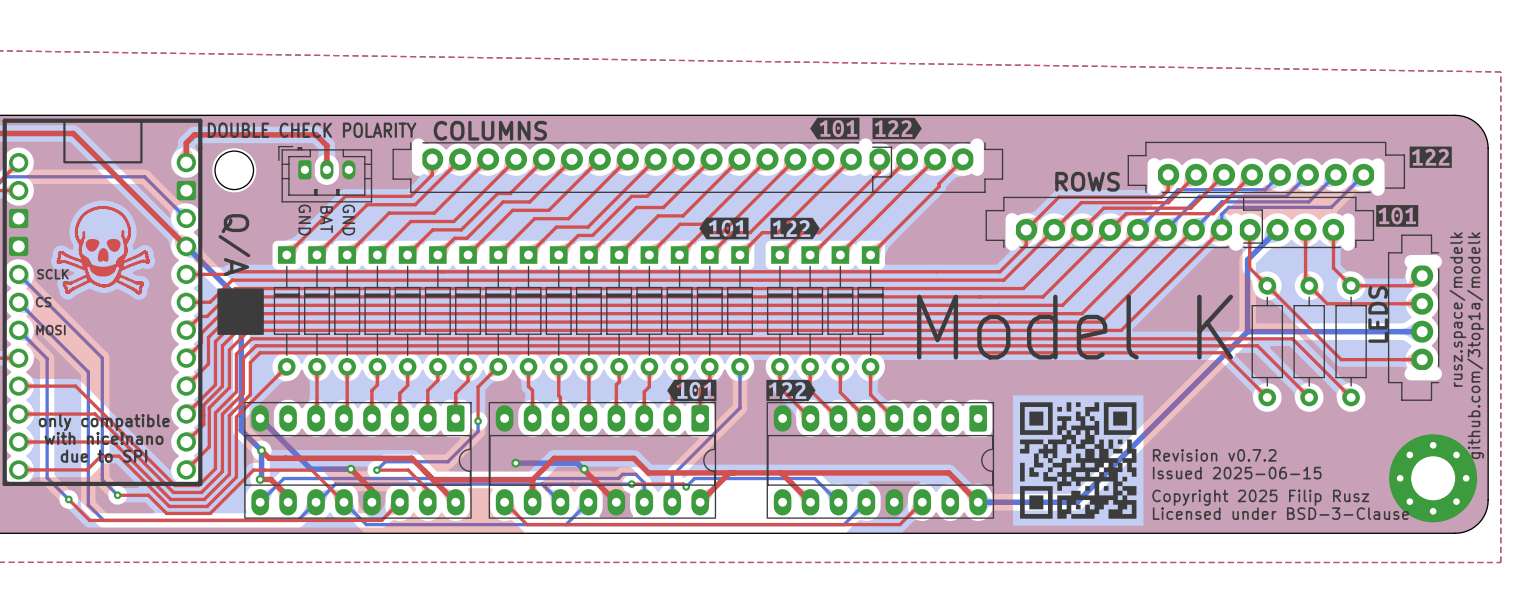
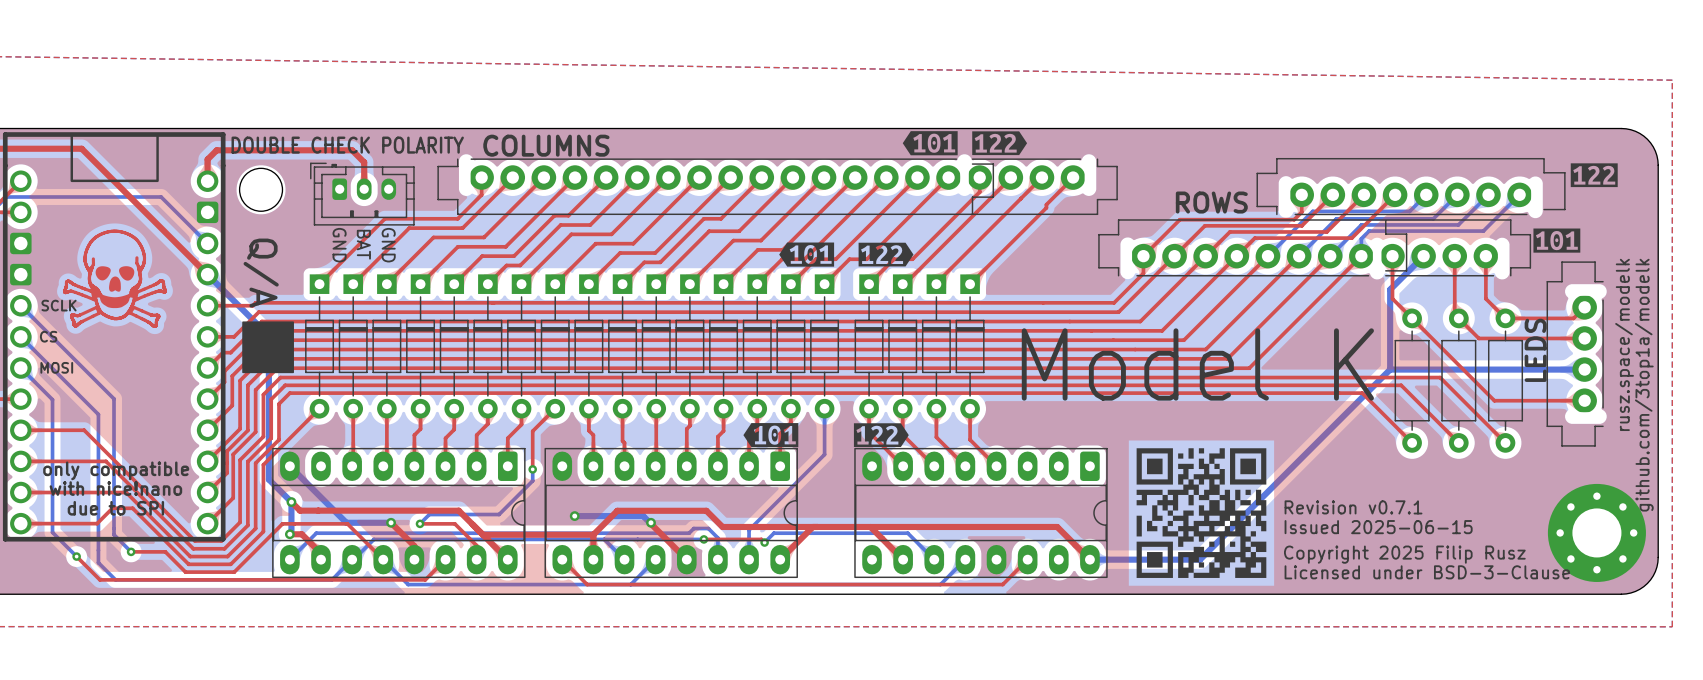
text: Revision v0.7.2 (1214, 455) -> Revision v0.7.1 (1353, 507)

